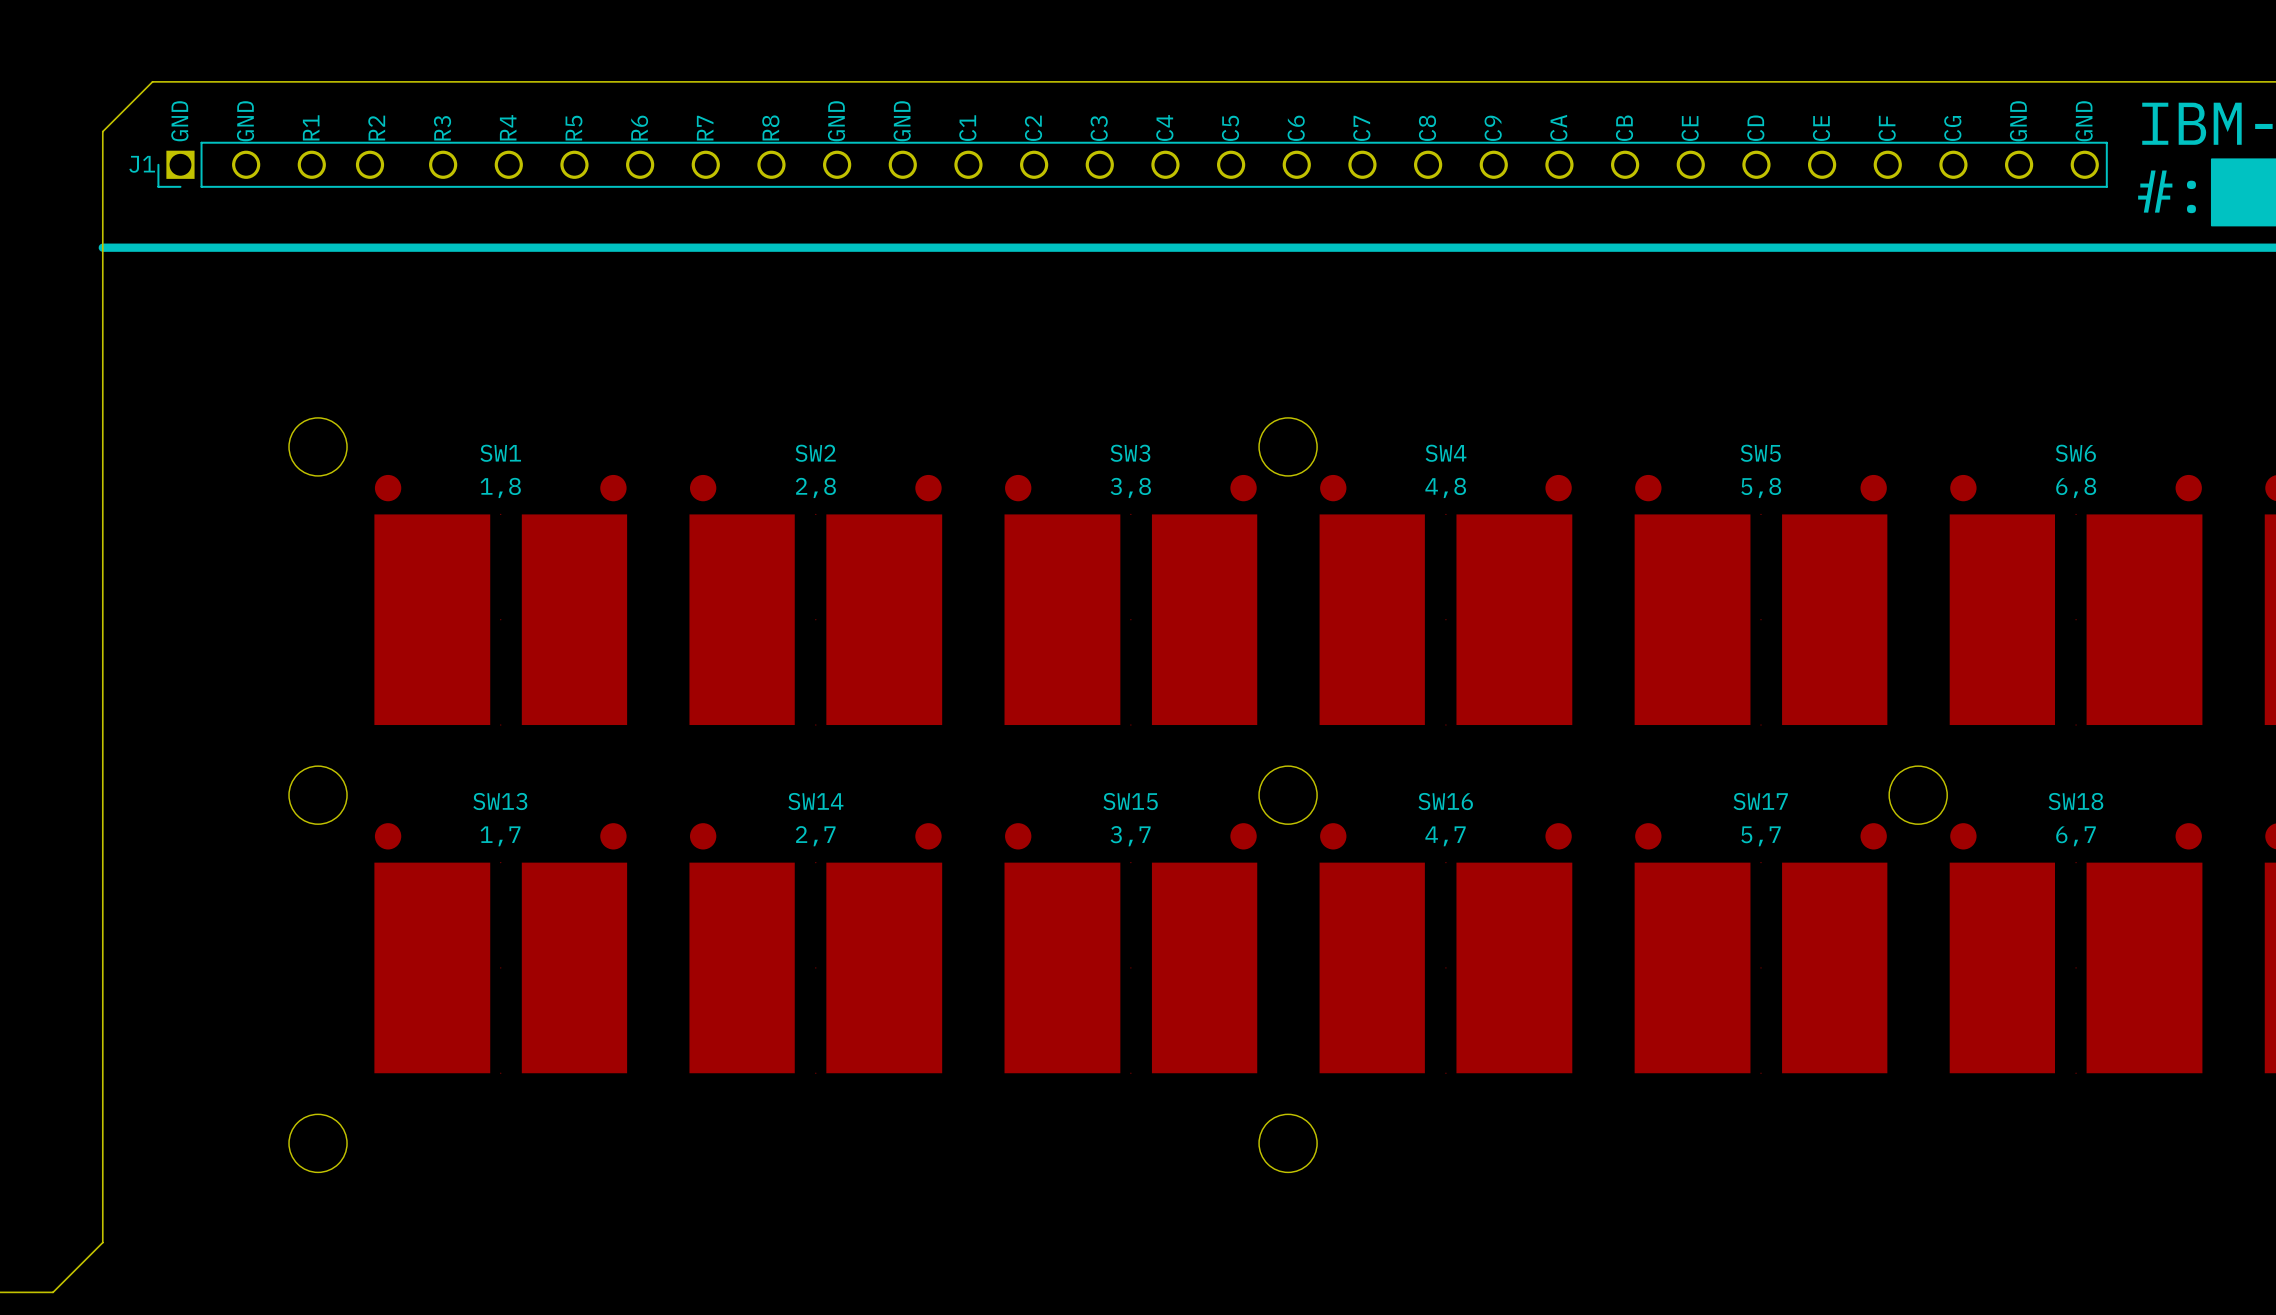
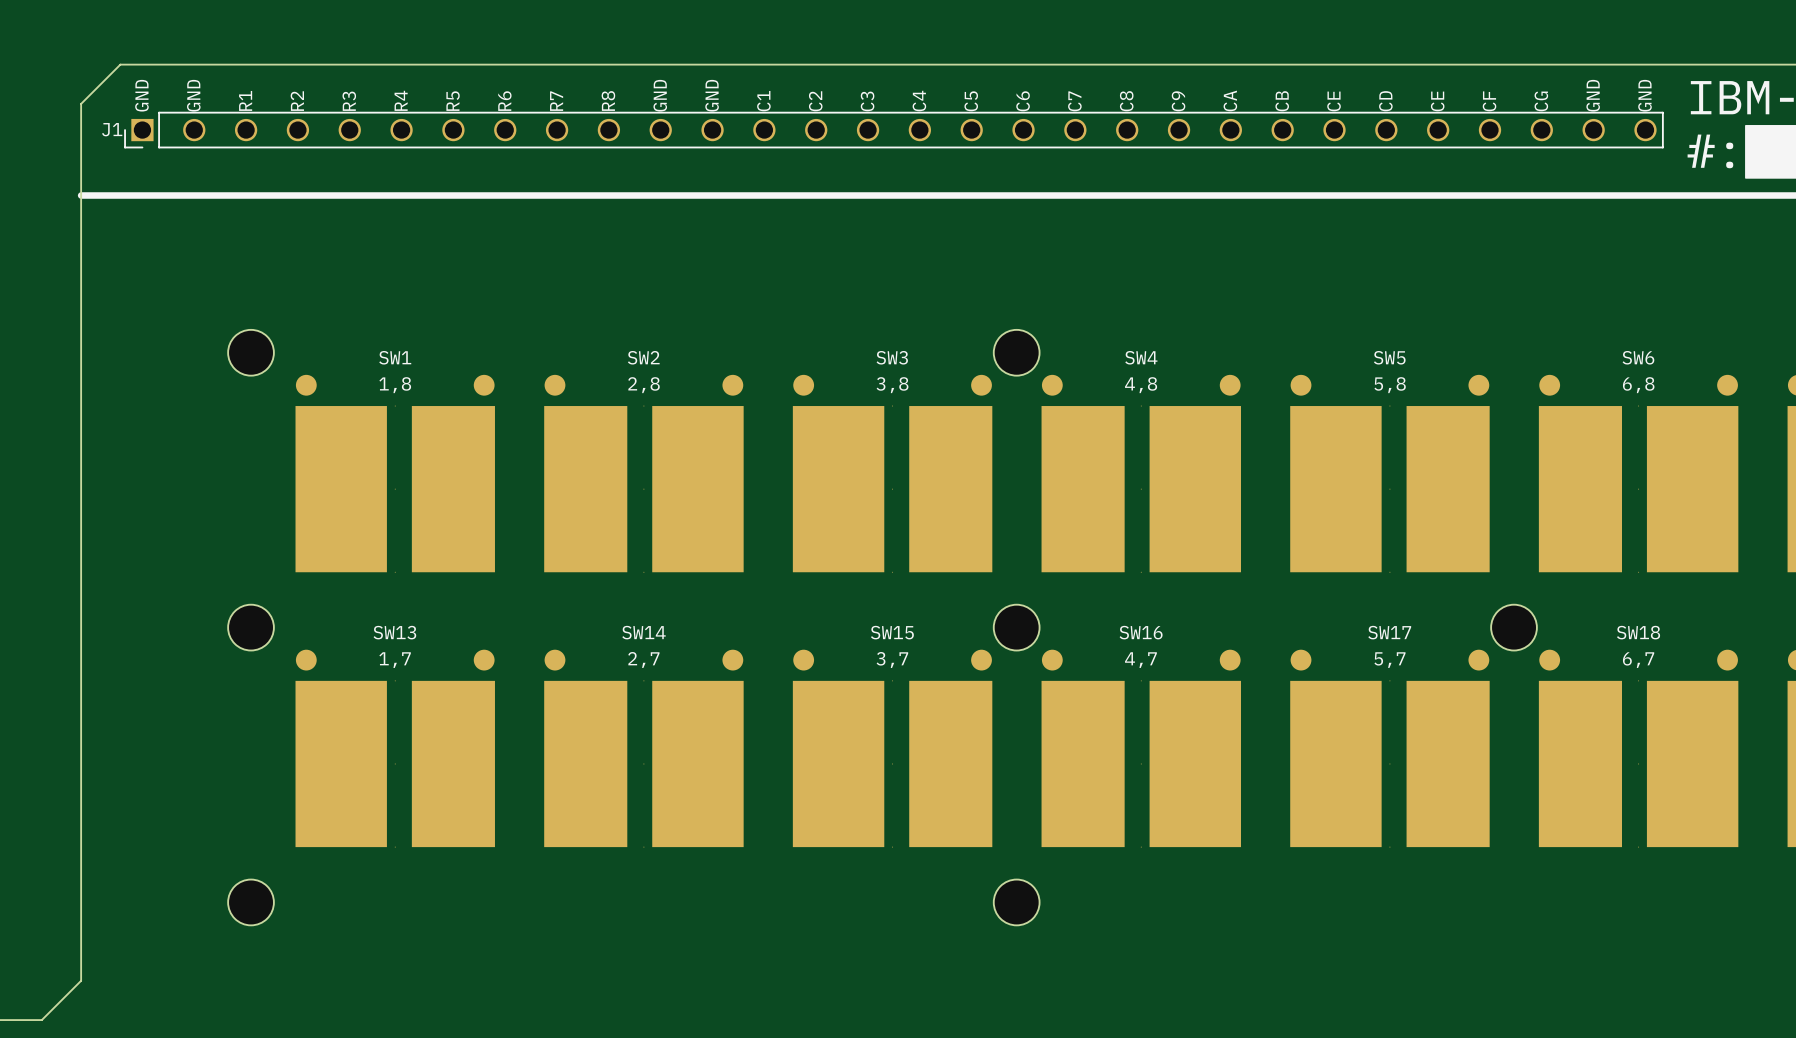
J1 footprint: [157, 141, 2108, 188] -> [124, 111, 1664, 149]

